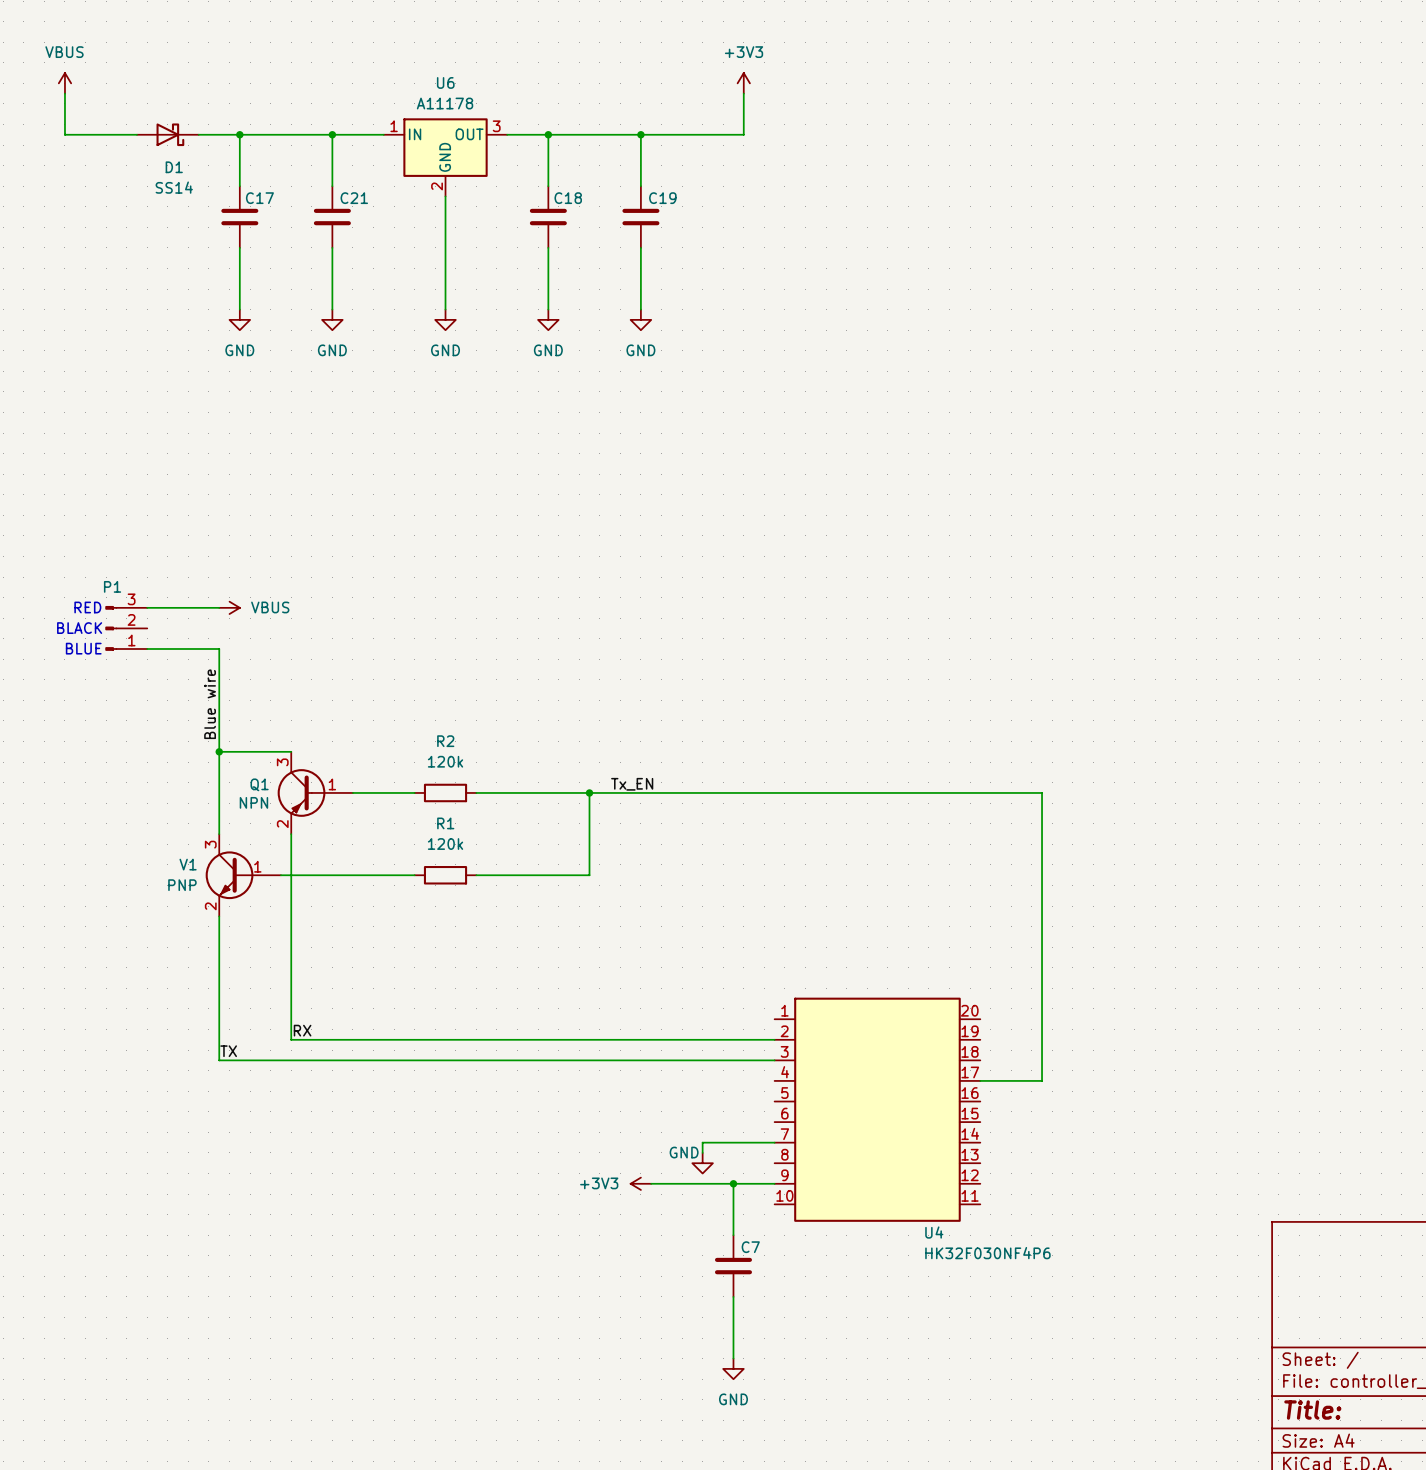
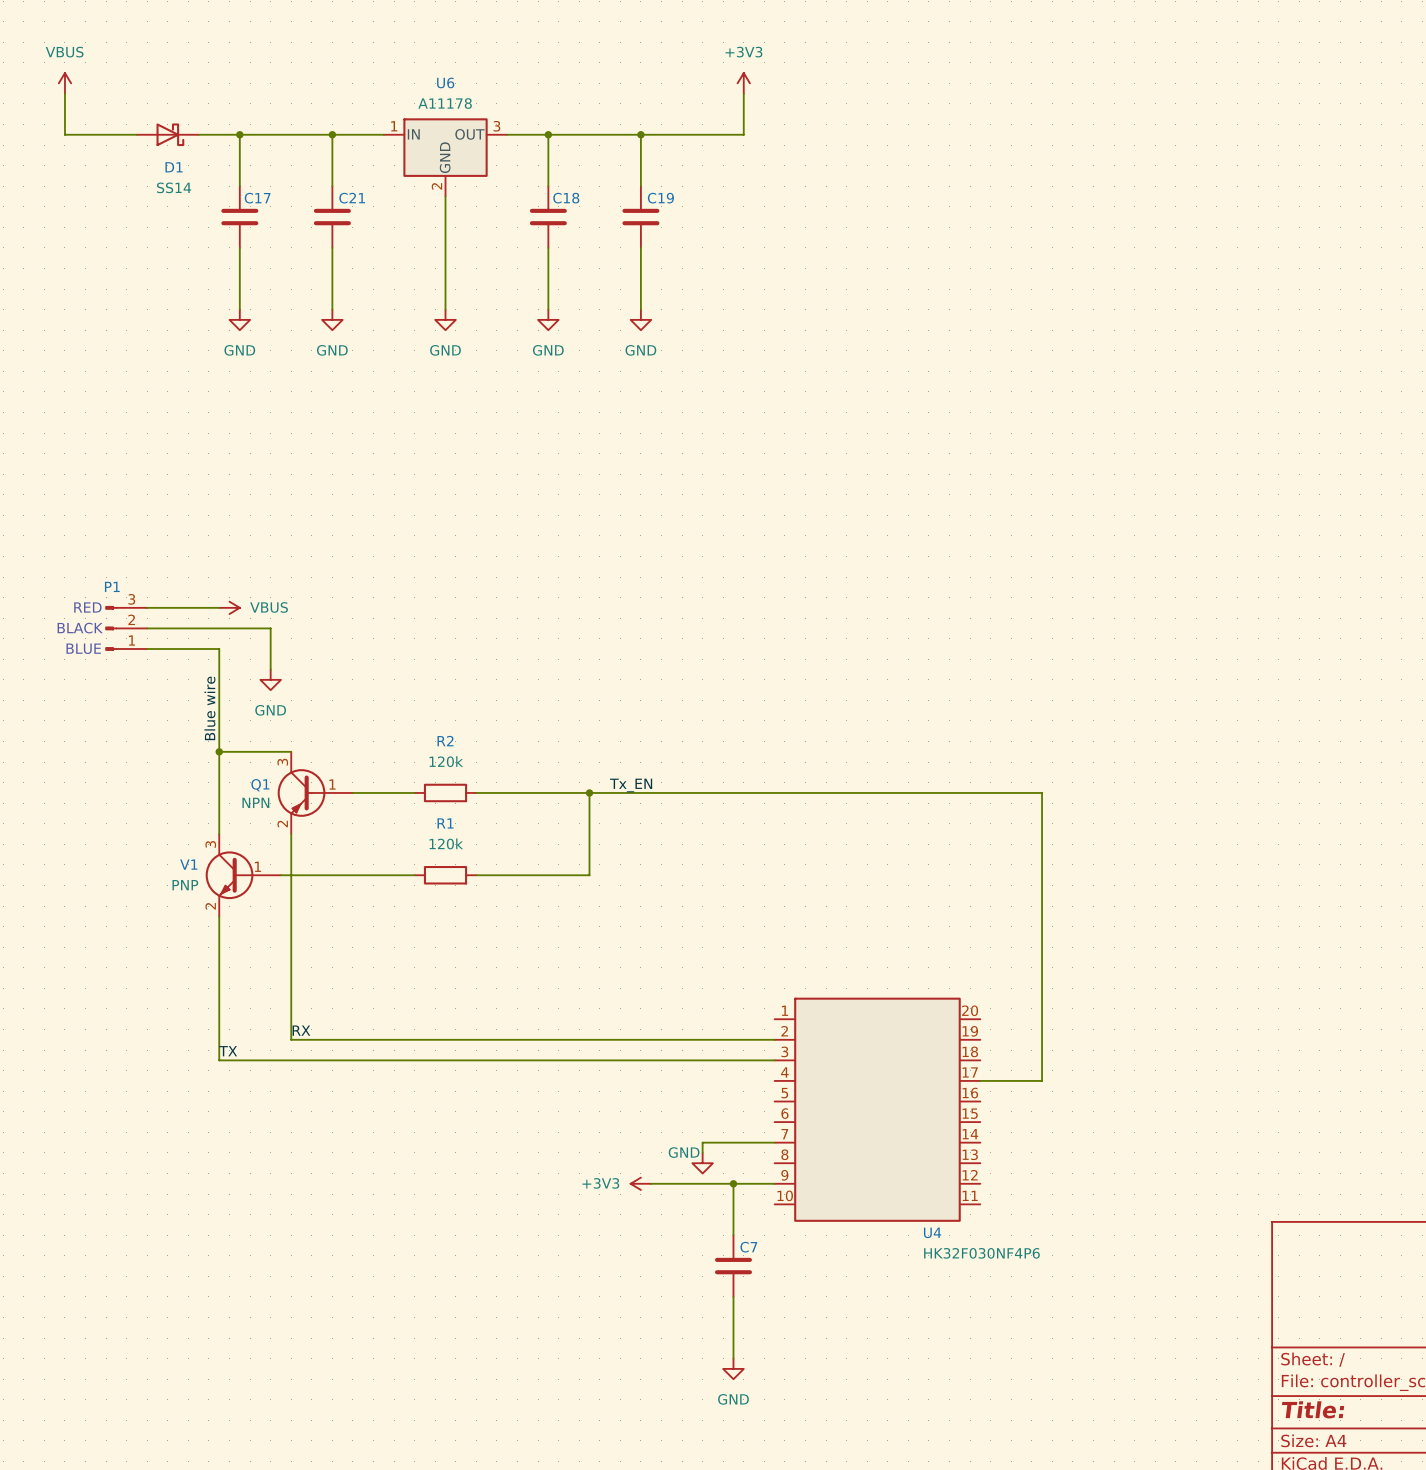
wire: none -> (147, 628) (270, 628) (270, 669)
power symbol: none -> GND (270, 679)

